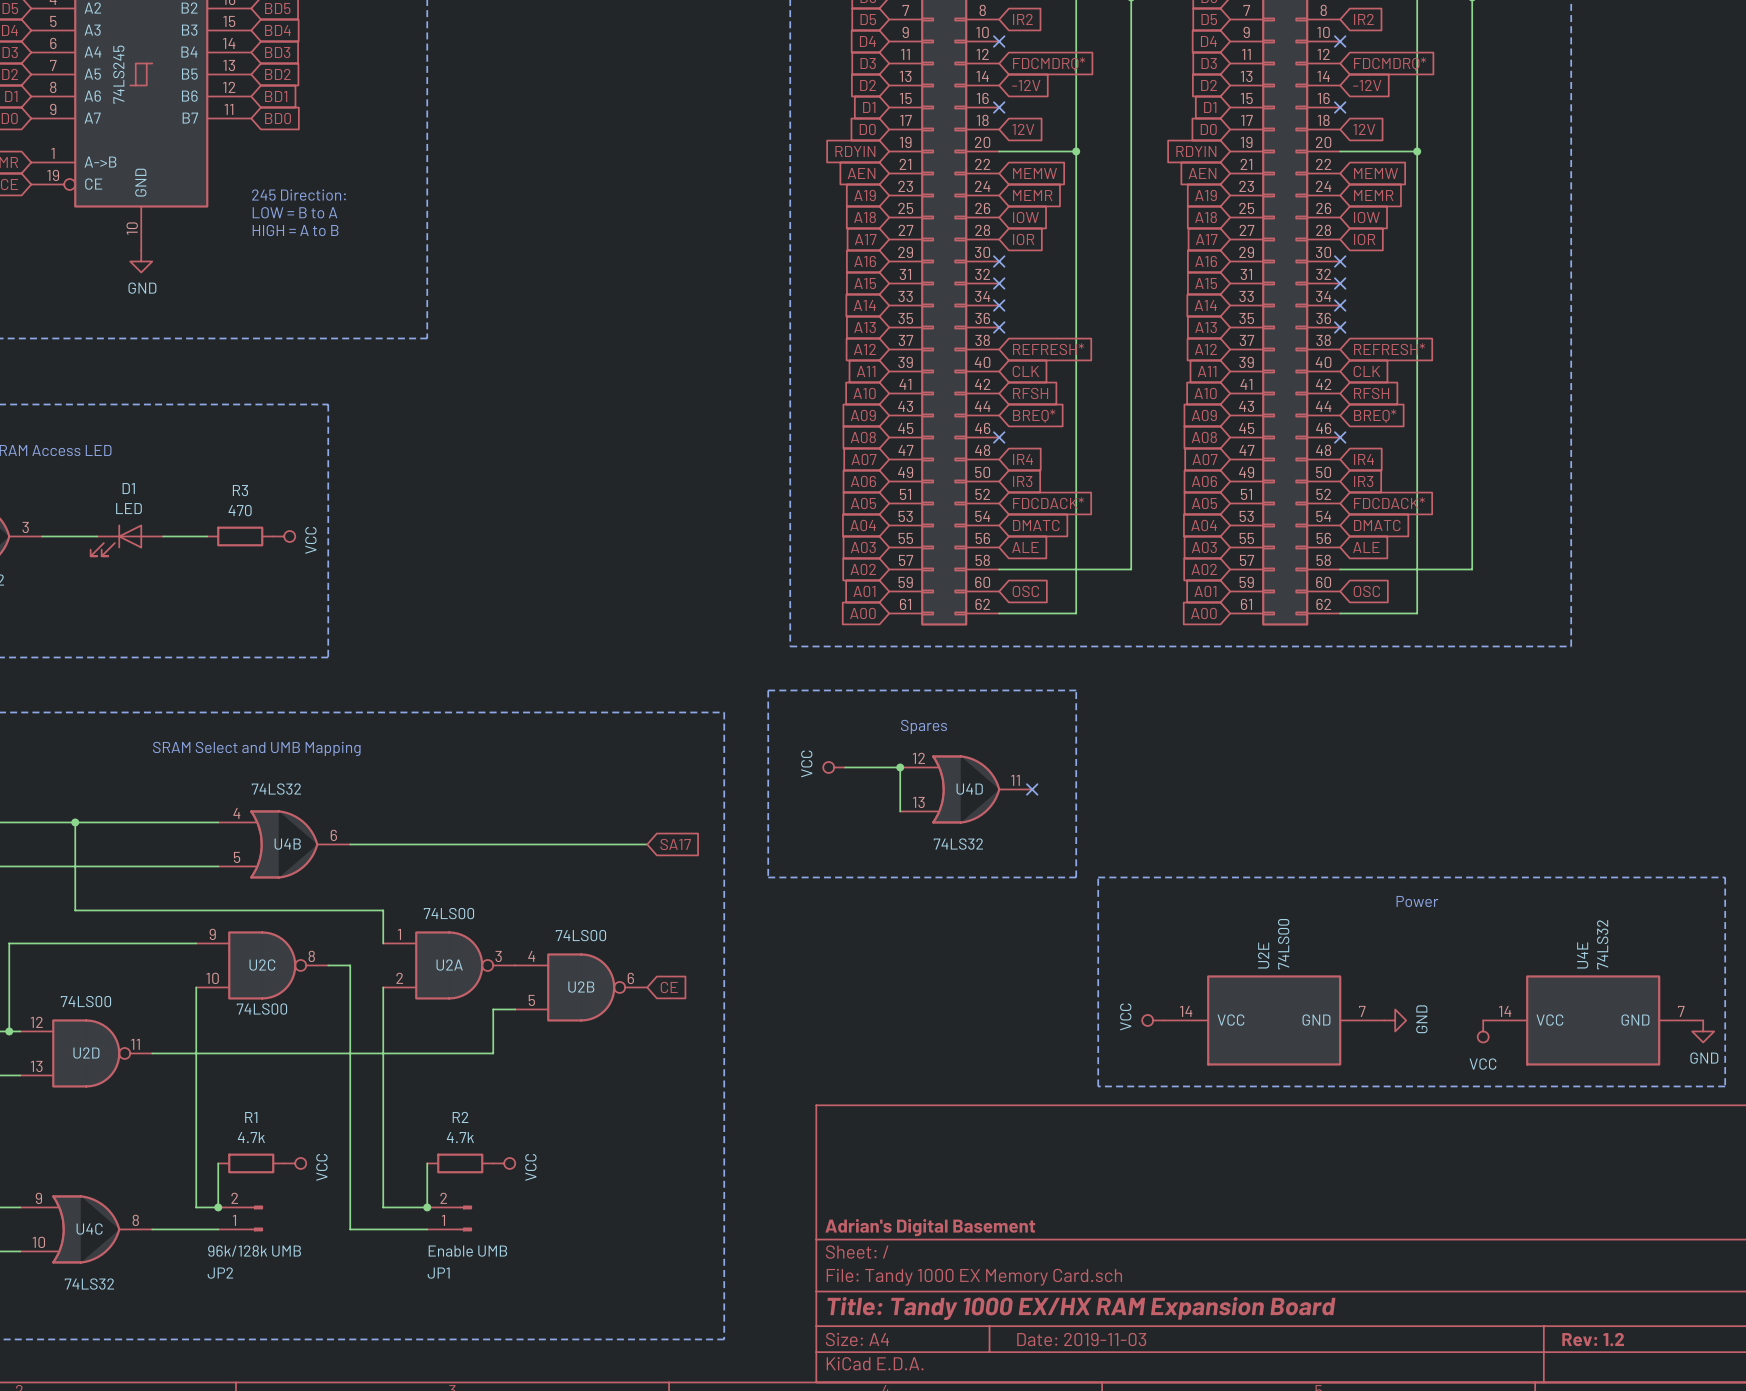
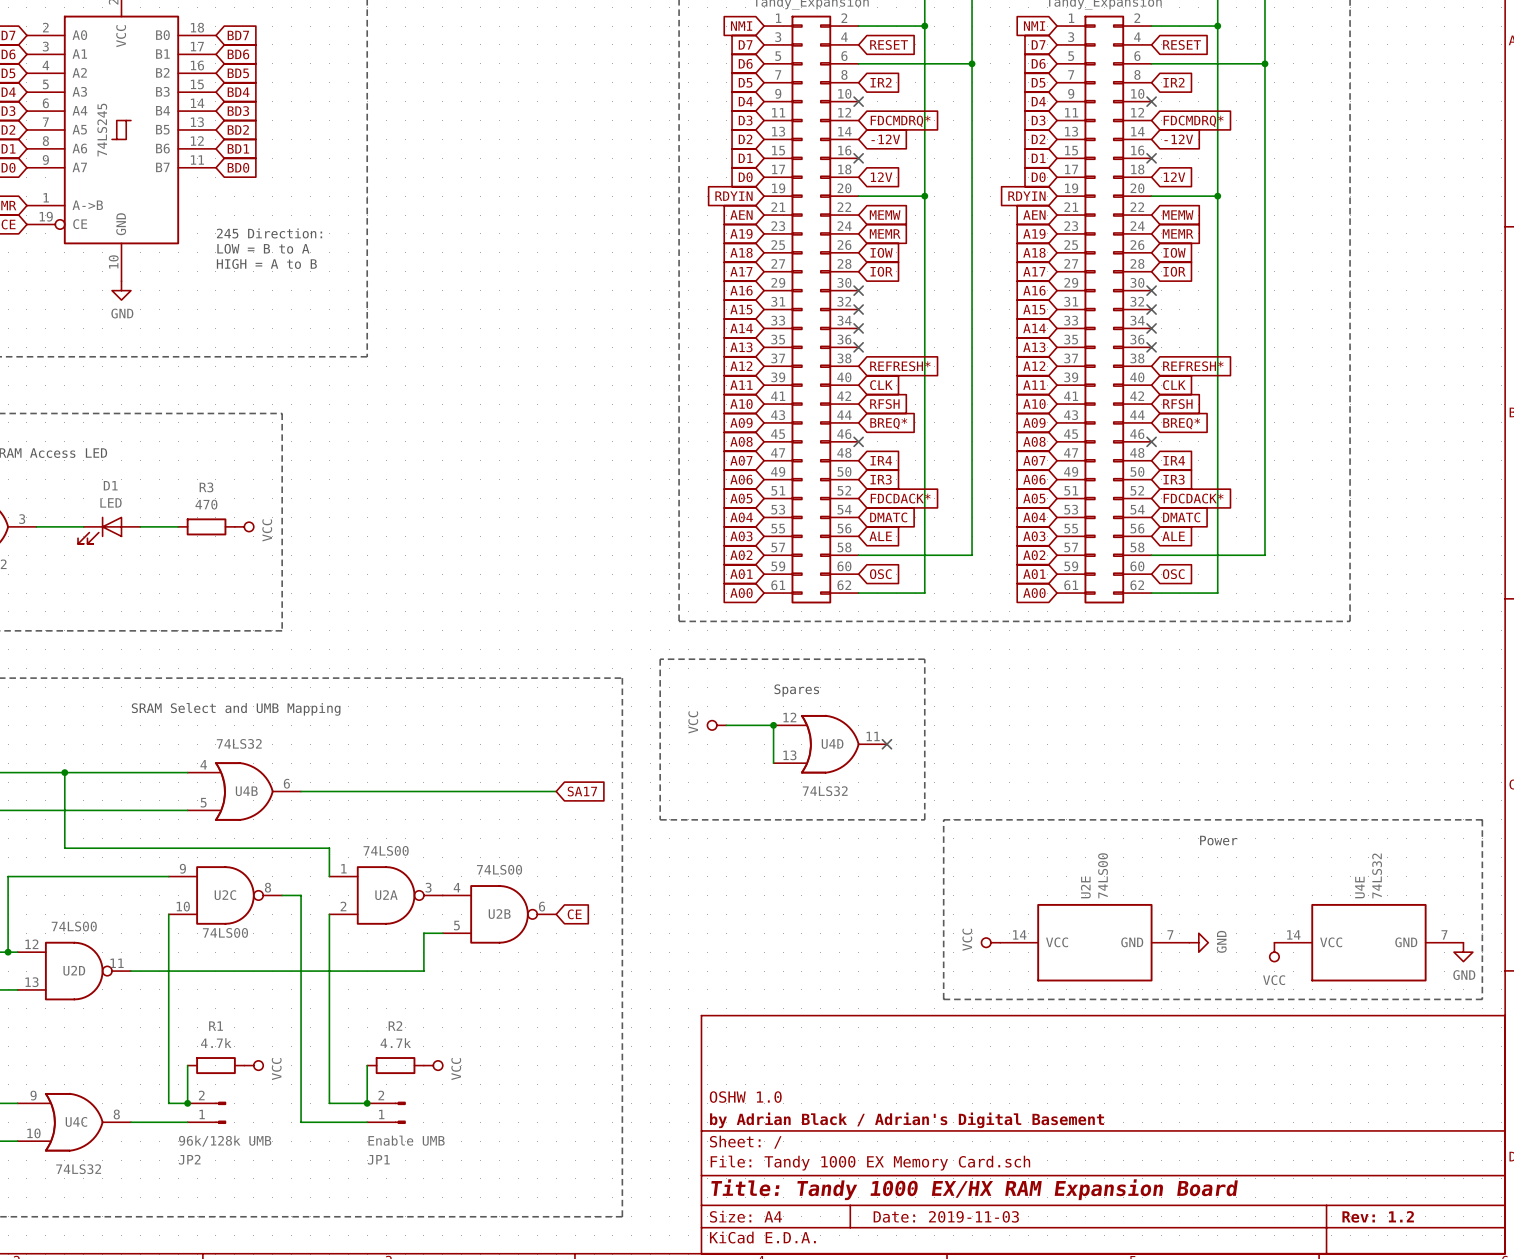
title block: none -> OSHW 1.0 (745, 1097)
title block: Adrian's Digital Basement (930, 1227) -> by Adrian Black / Adrian's Digital Basement (907, 1120)

